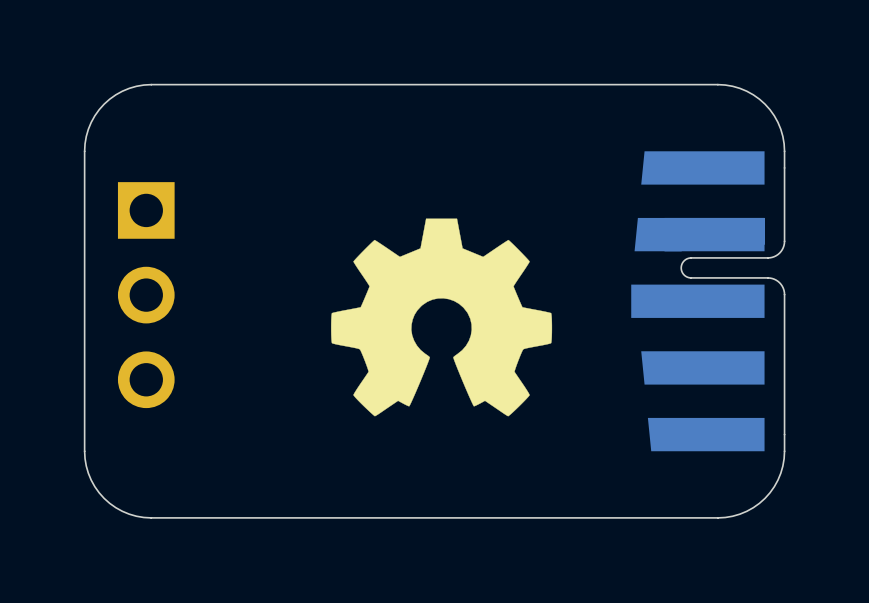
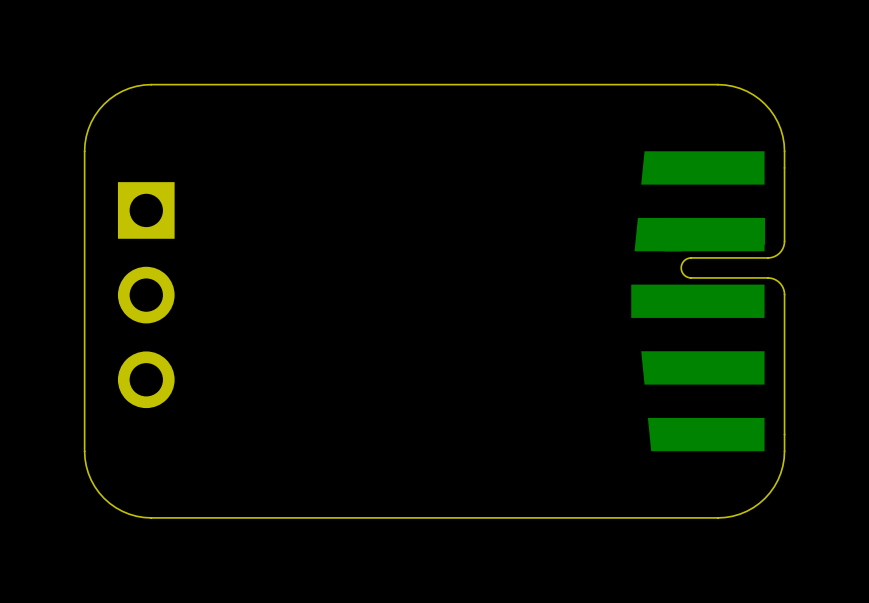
drawing: [331, 218, 553, 417] -> none

